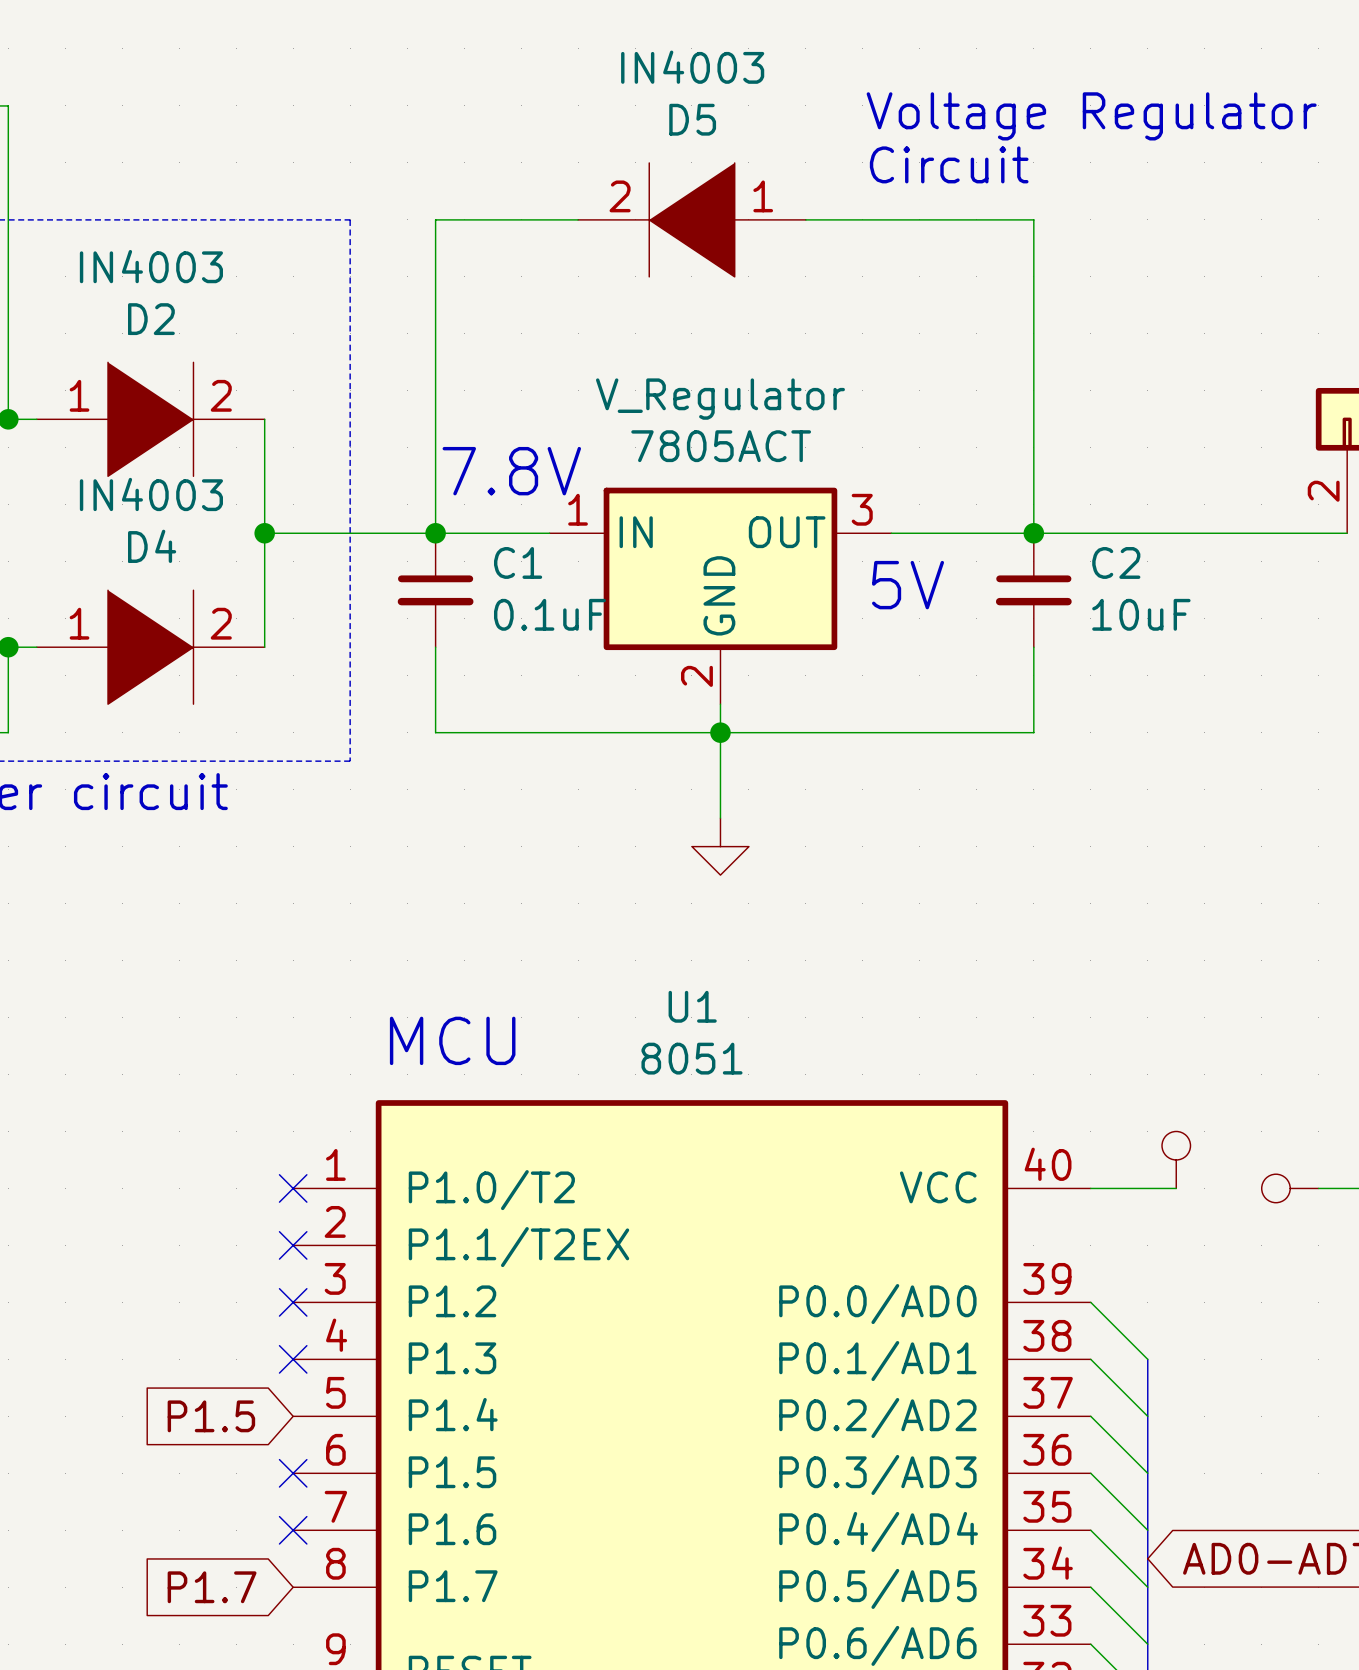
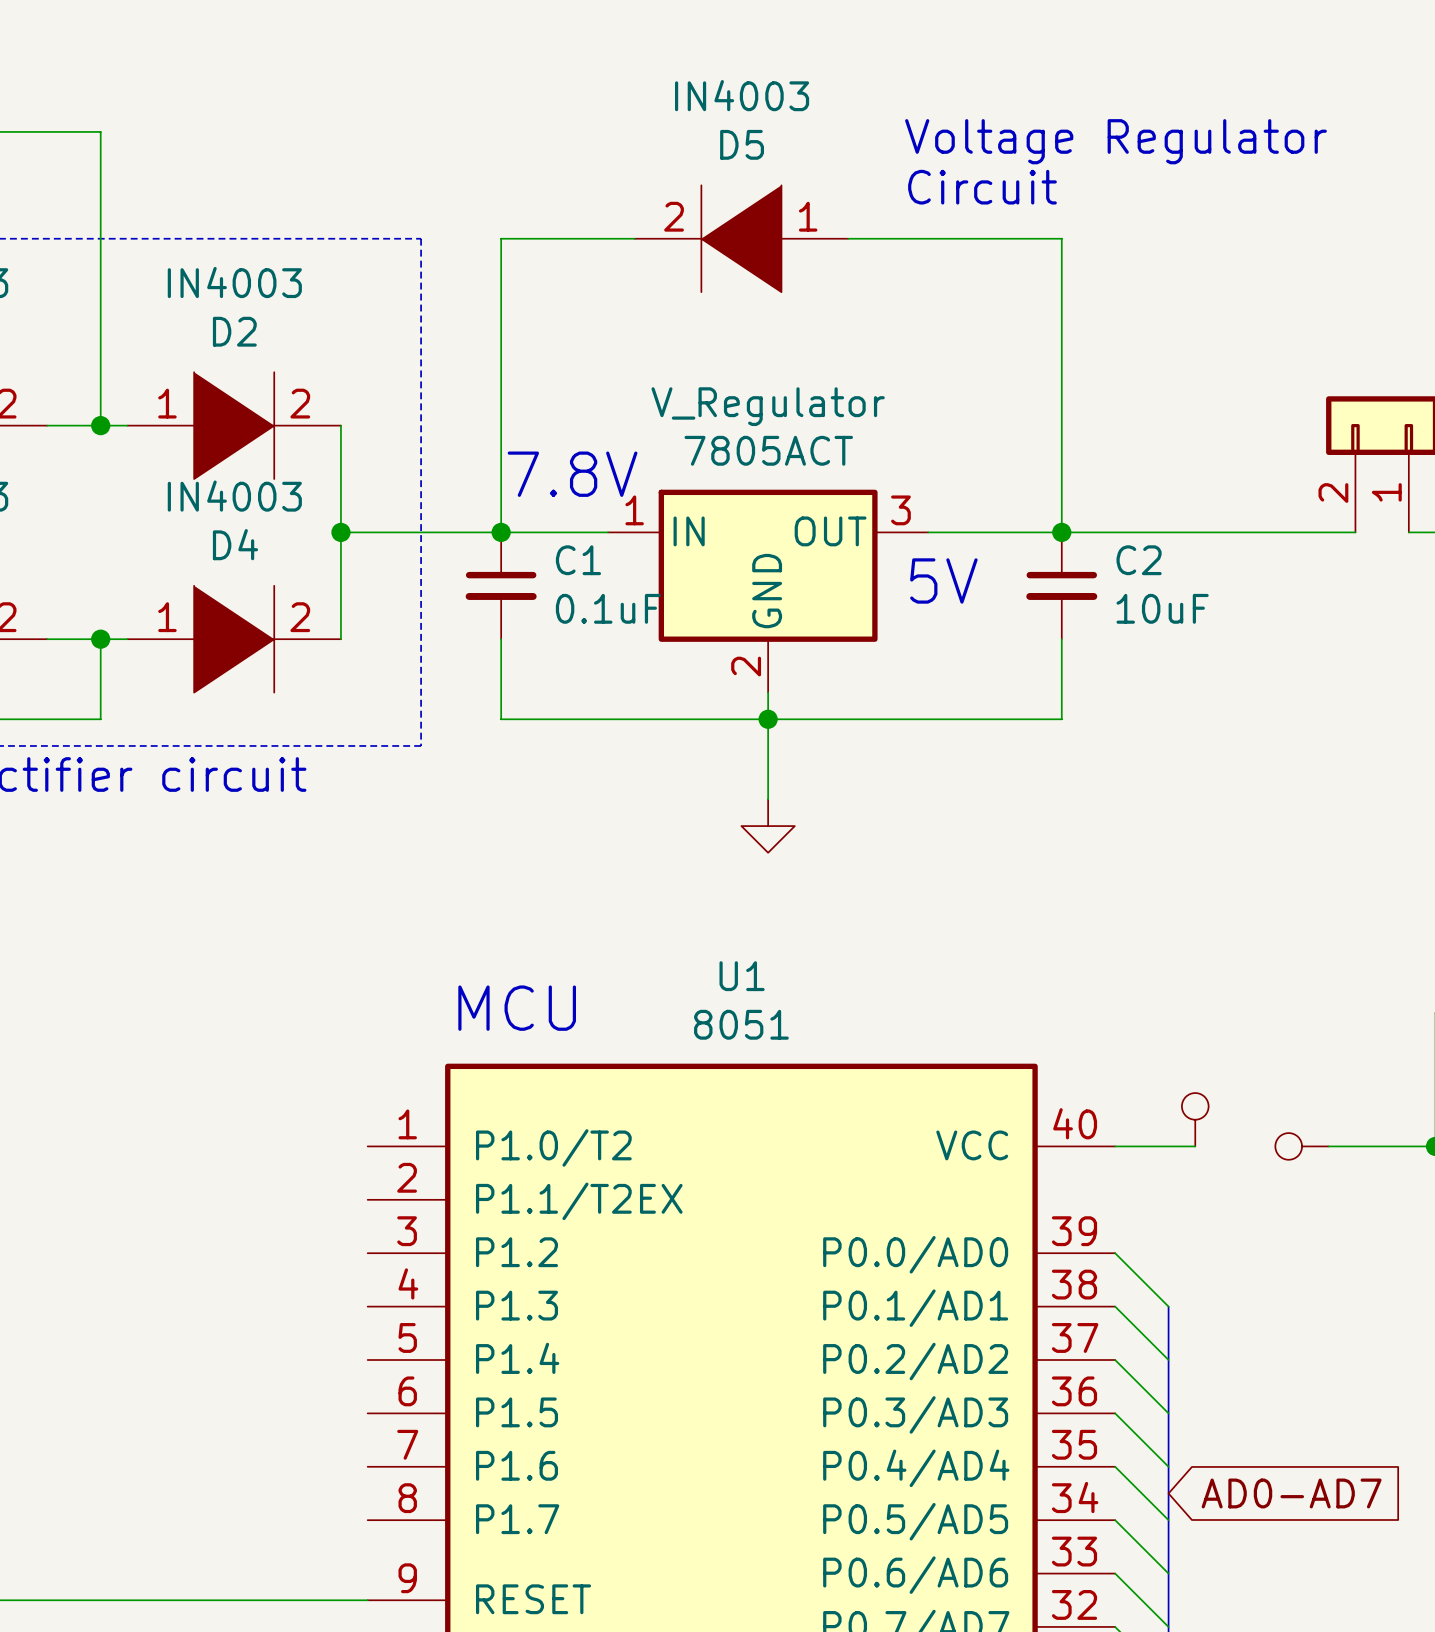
no-connect mark: (293, 1188) -> none
no-connect mark: (293, 1245) -> none
no-connect mark: (293, 1302) -> none
no-connect mark: (293, 1359) -> none
global label: P1.5 (211, 1416) -> none
no-connect mark: (293, 1473) -> none
no-connect mark: (293, 1530) -> none
global label: P1.7 (212, 1587) -> none

